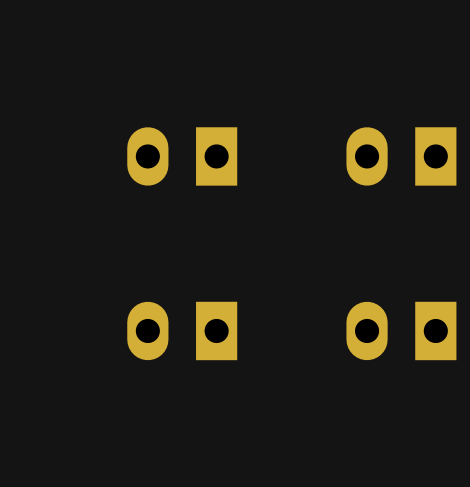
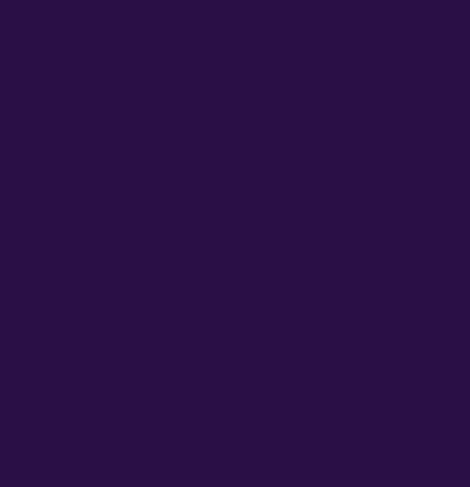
part: (182, 156) -> none
part: (401, 156) -> none
part: (182, 330) -> none
part: (401, 330) -> none

